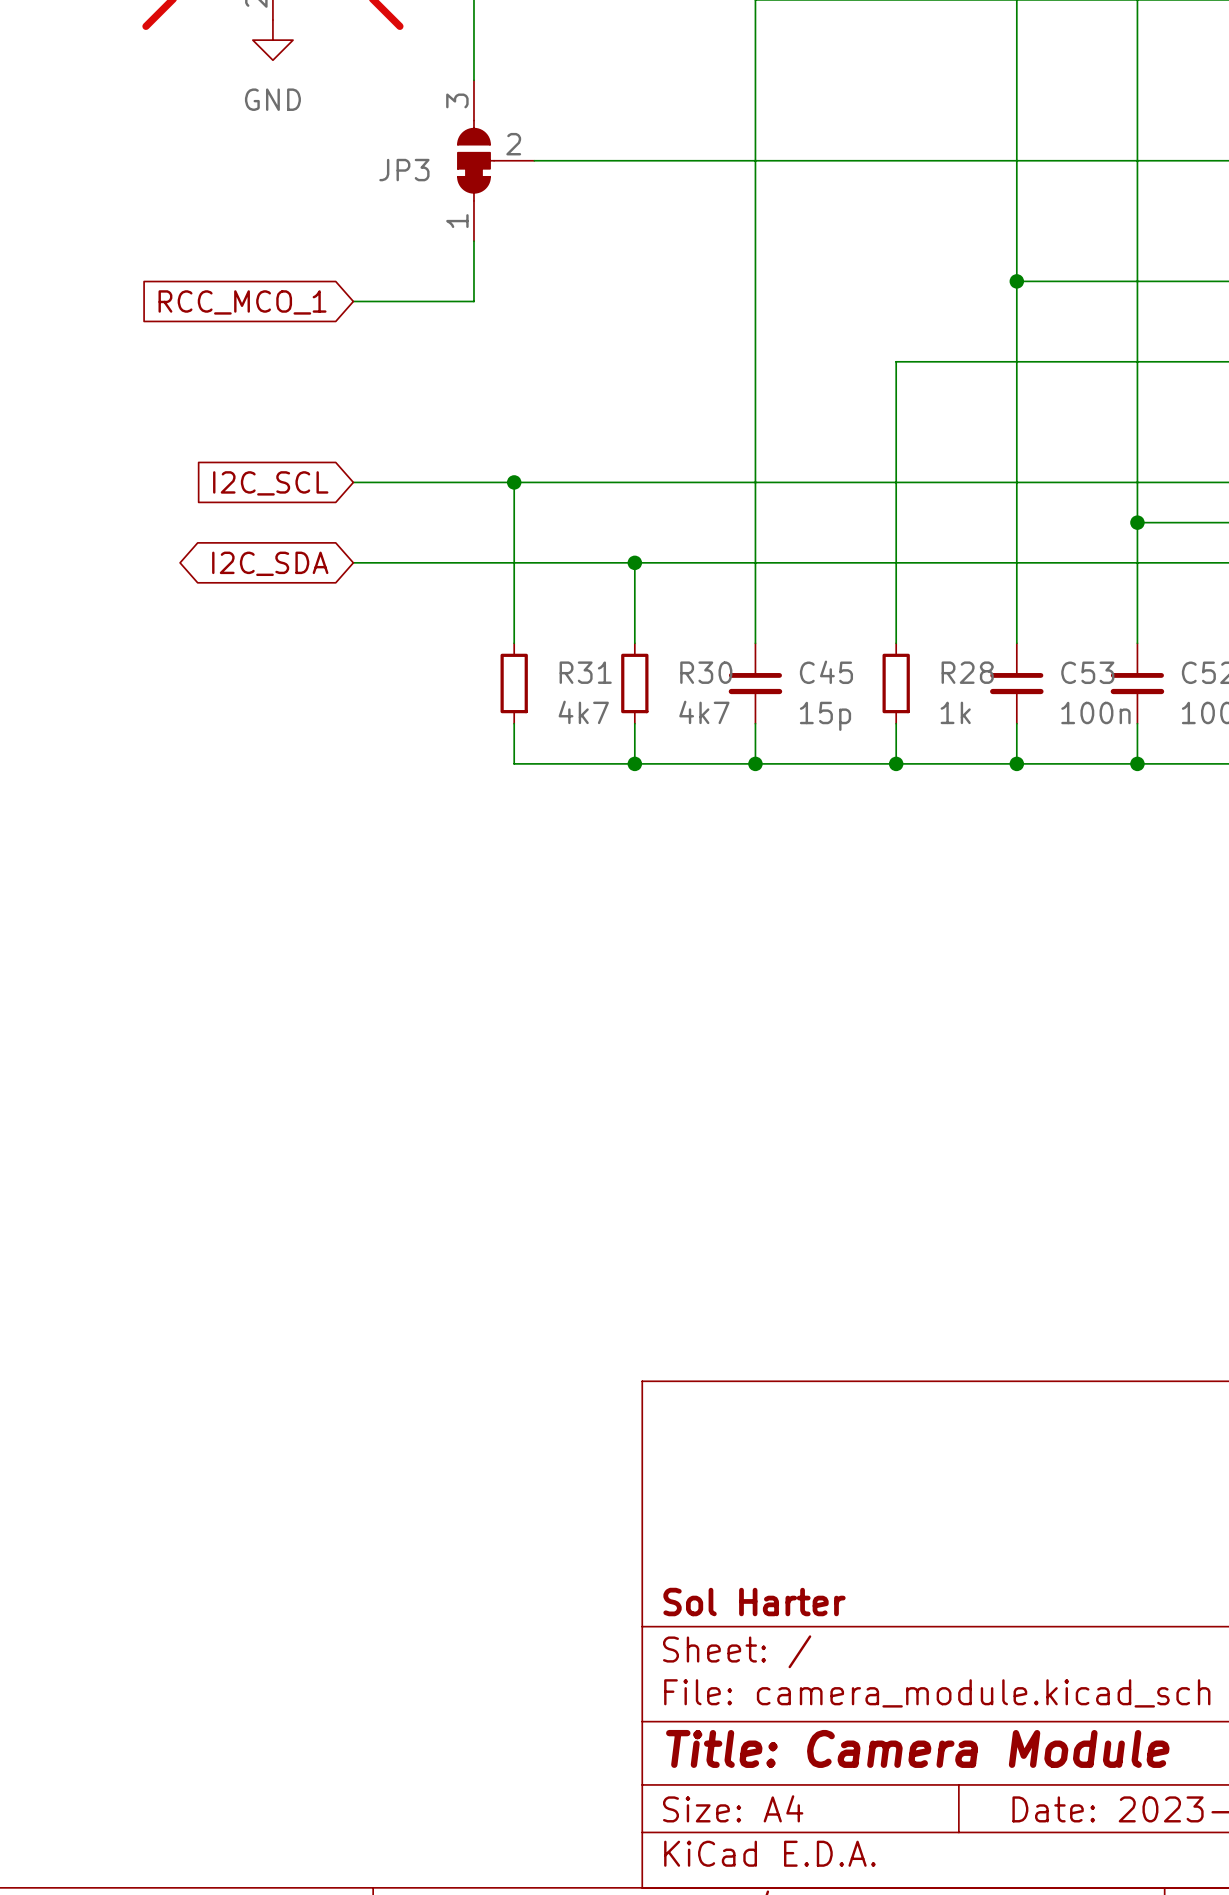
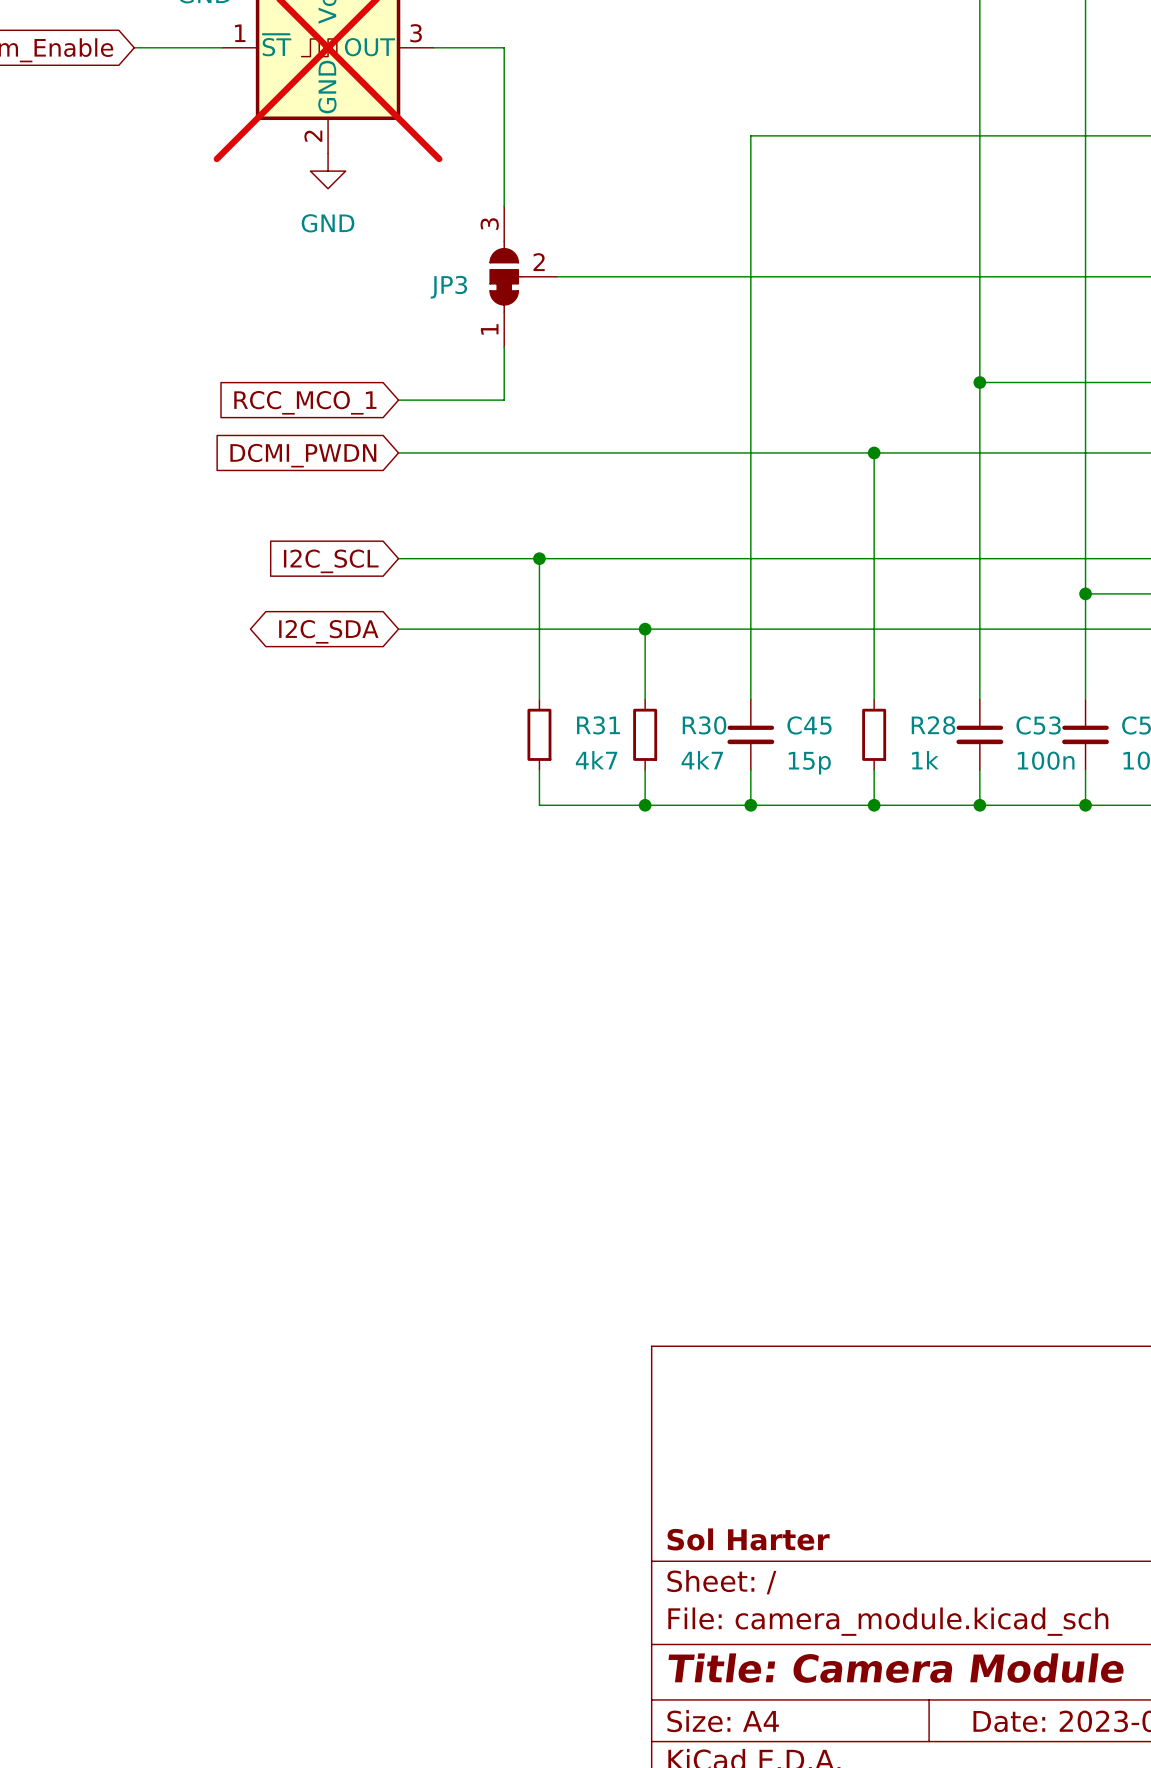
wire: none -> (398, 452) (874, 452)
junction: none -> (874, 452)
global label: none -> DCMI_PWDN (303, 455)

